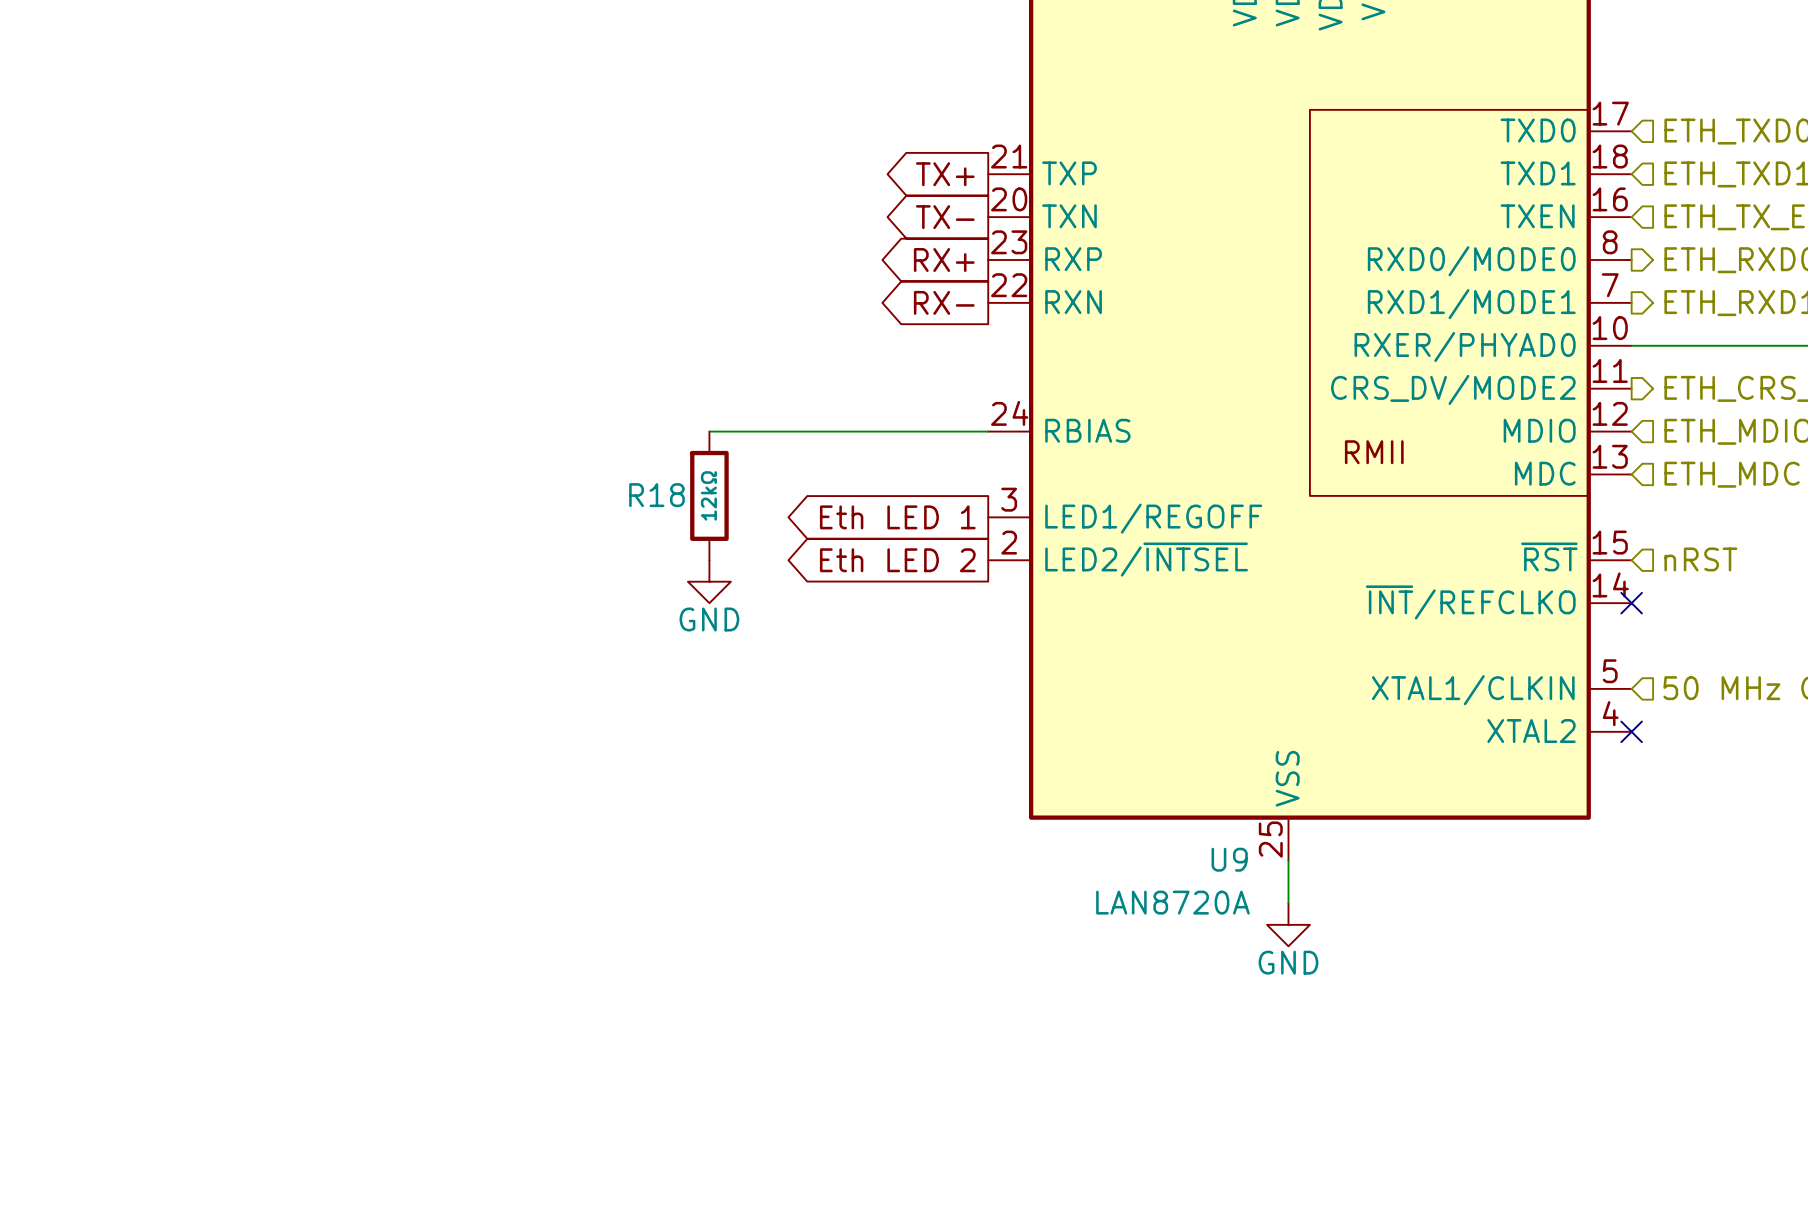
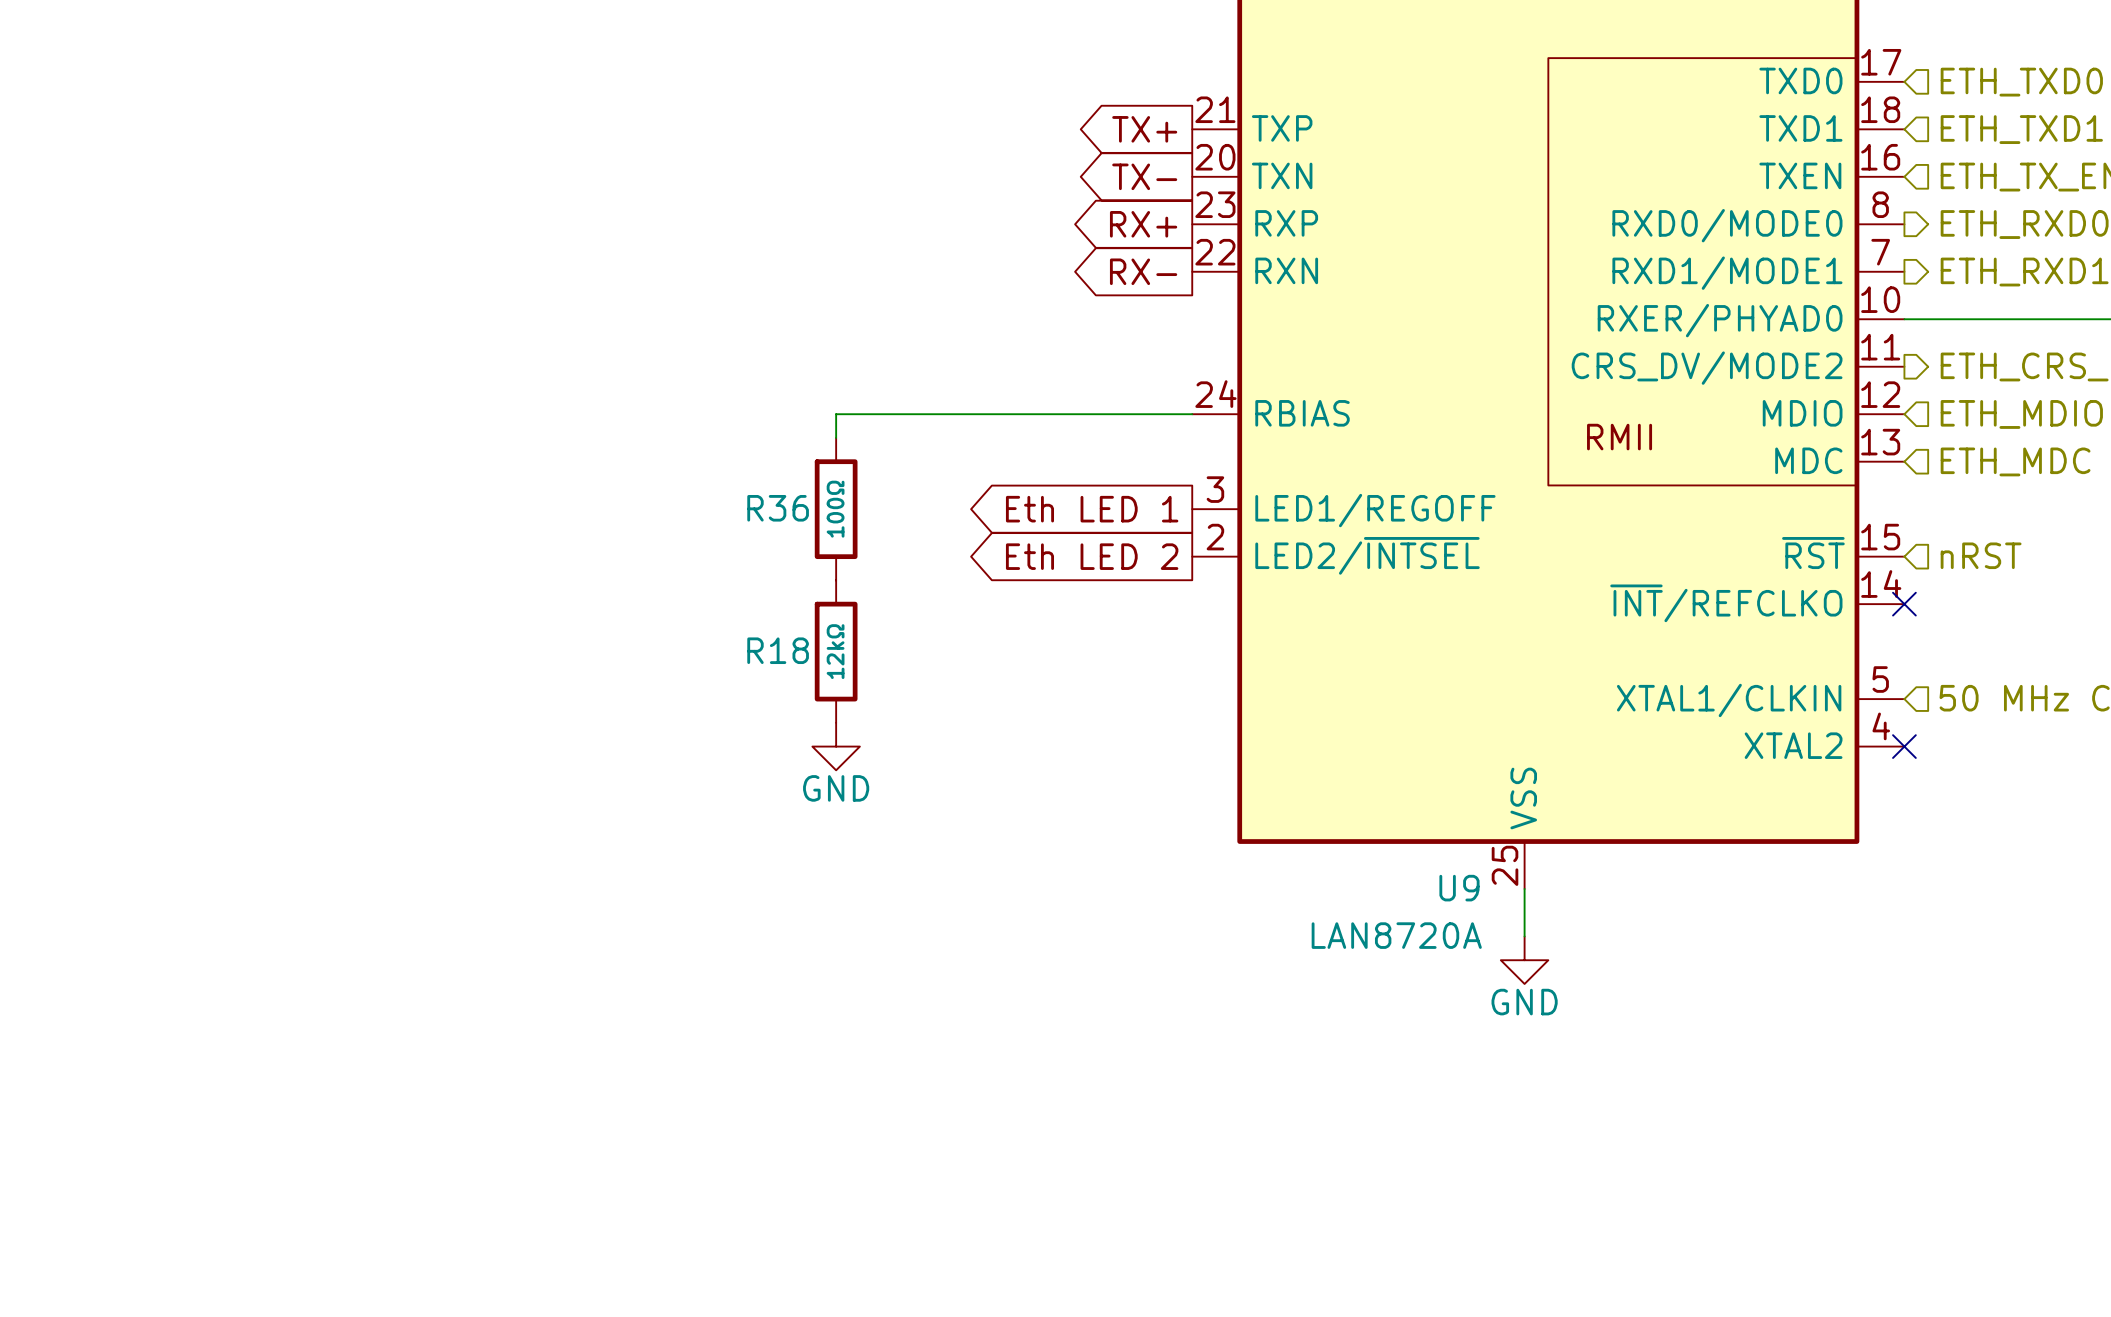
wire: none -> (883, 414) (836, 414) (836, 437)
R18 position: (709, 495) -> (836, 651)
R36: none -> 100Ω (836, 509)
power symbol position: GND (709, 581) -> GND (836, 746)

